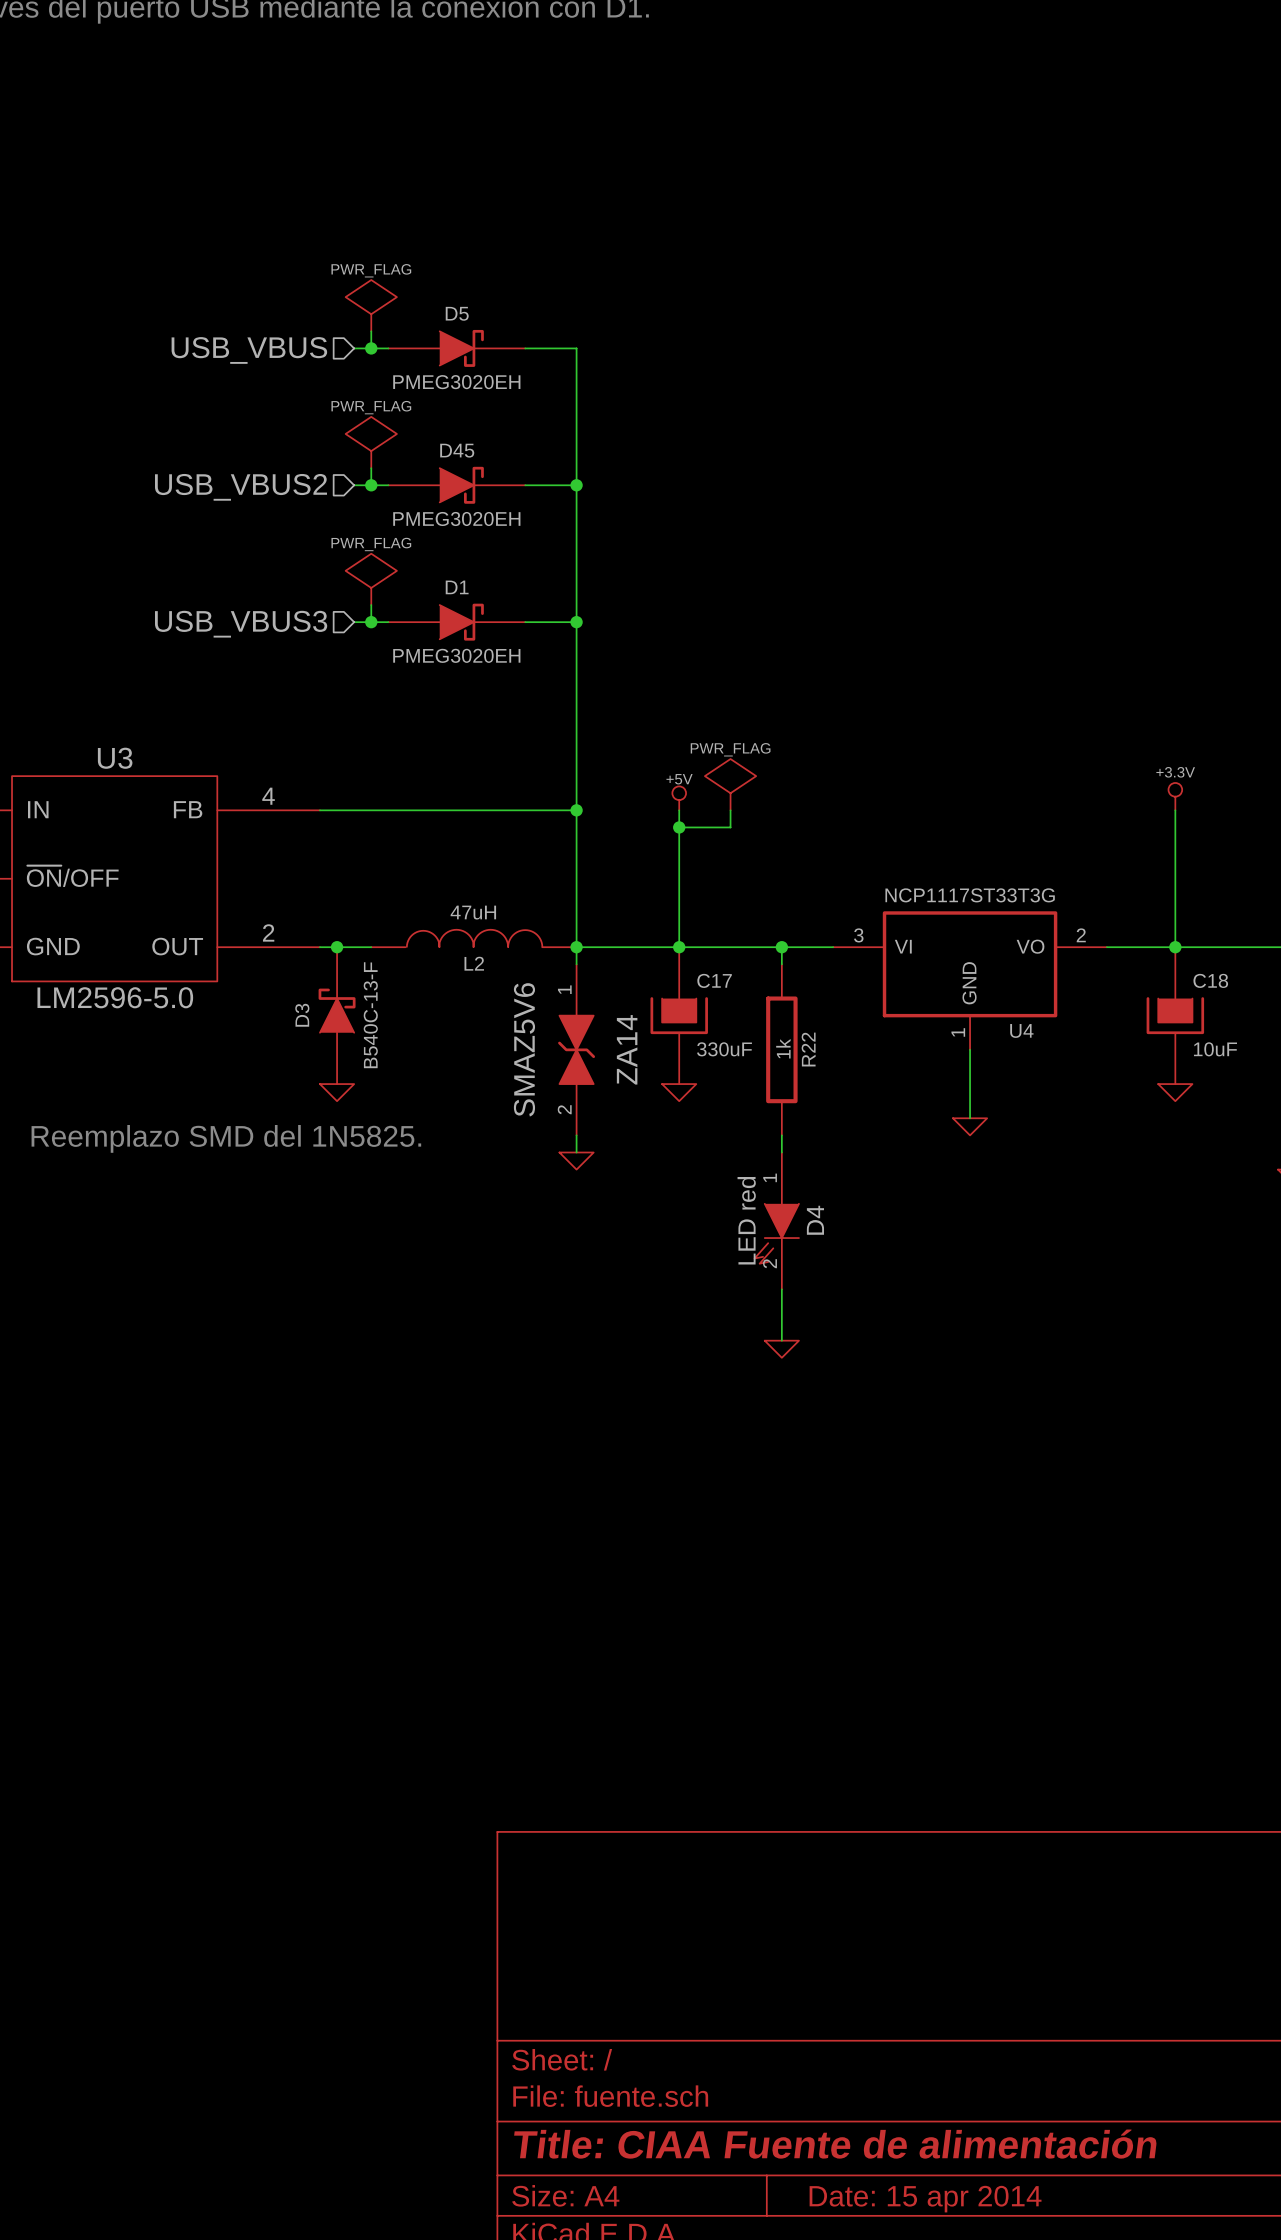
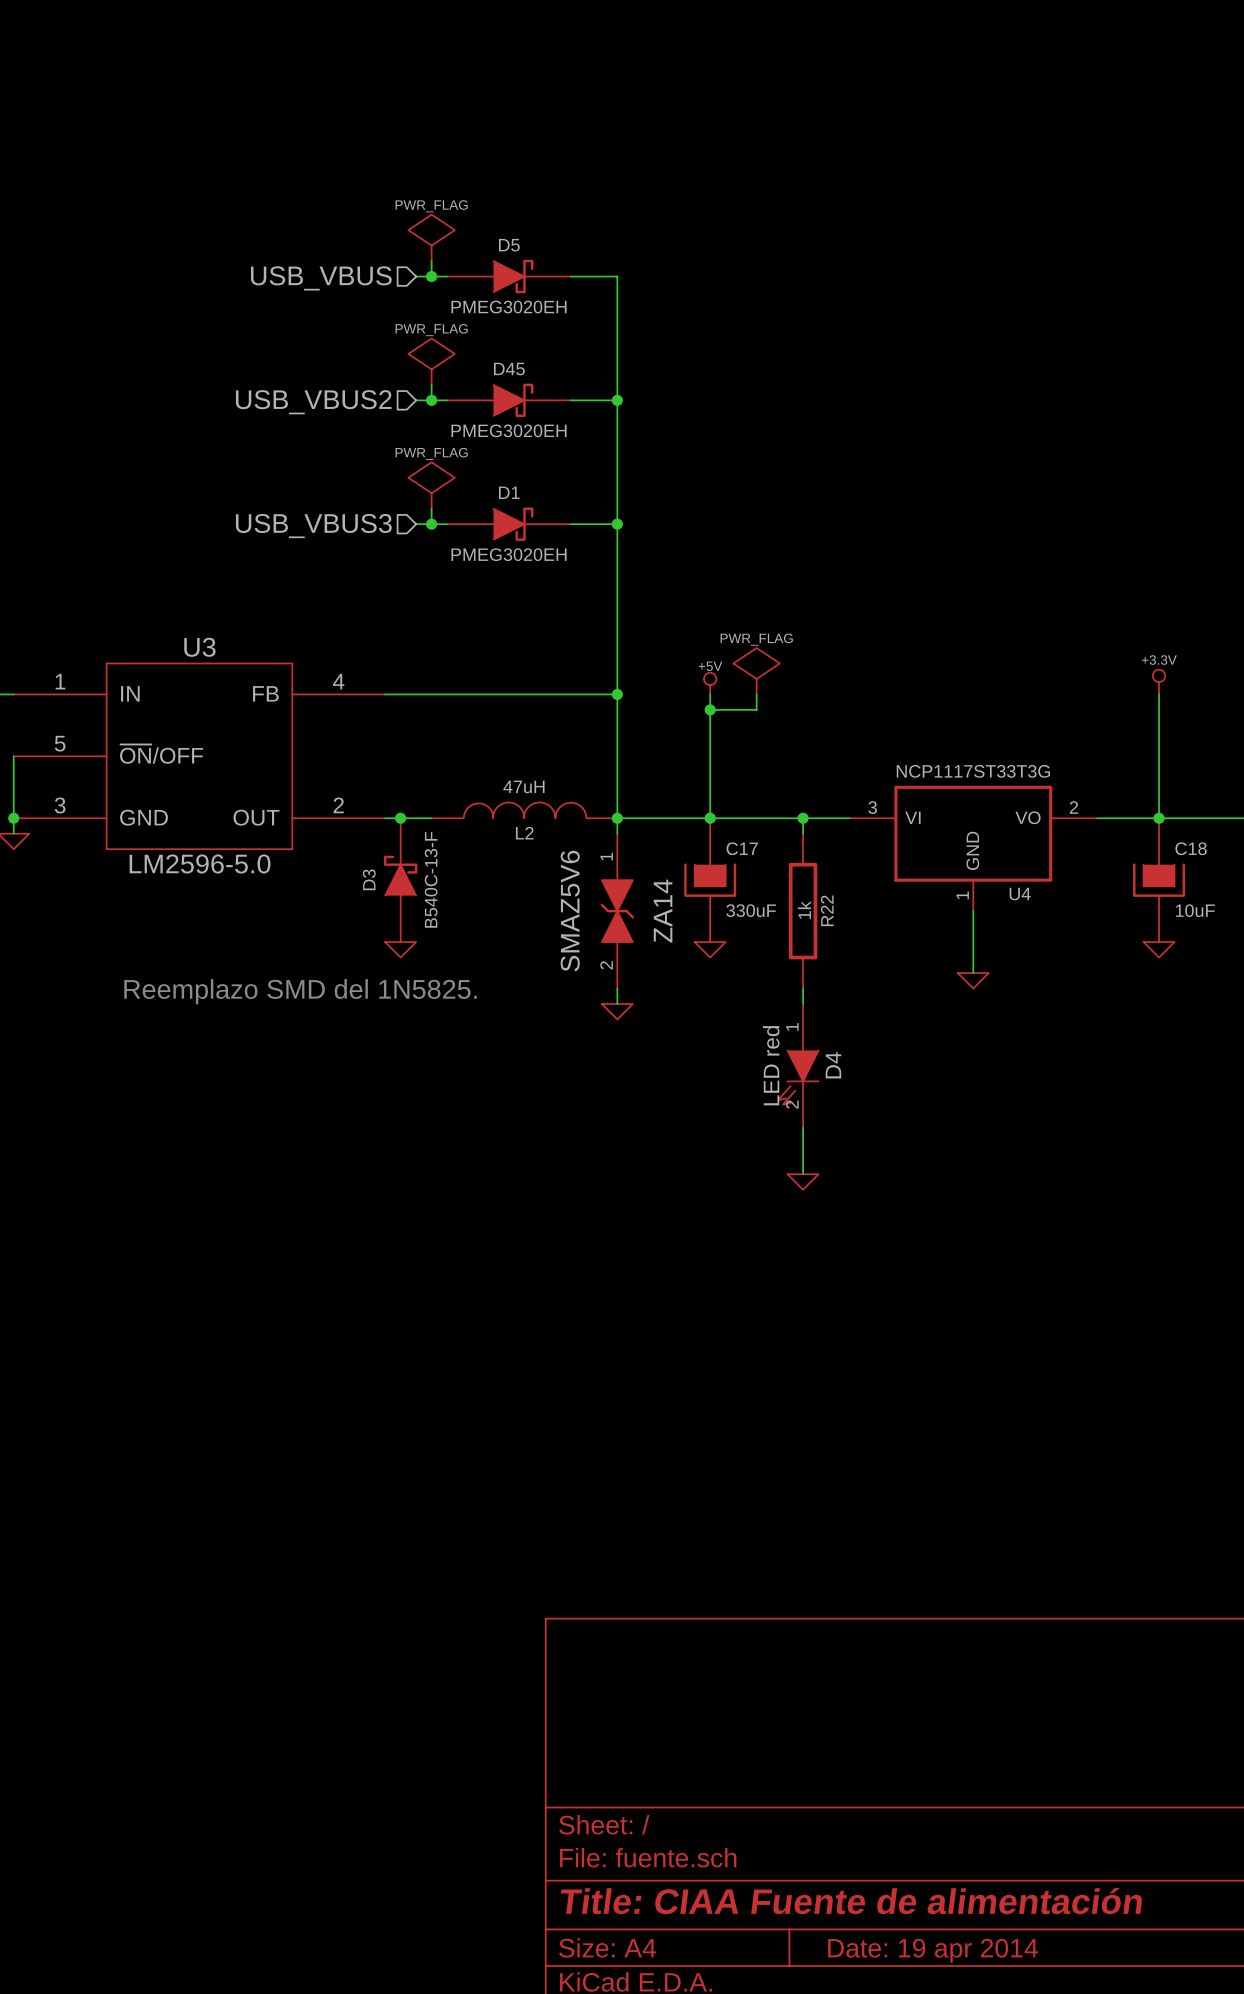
title block: Date: 15 apr 2014 (925, 2199) -> Date: 19 apr 2014 (933, 1950)

